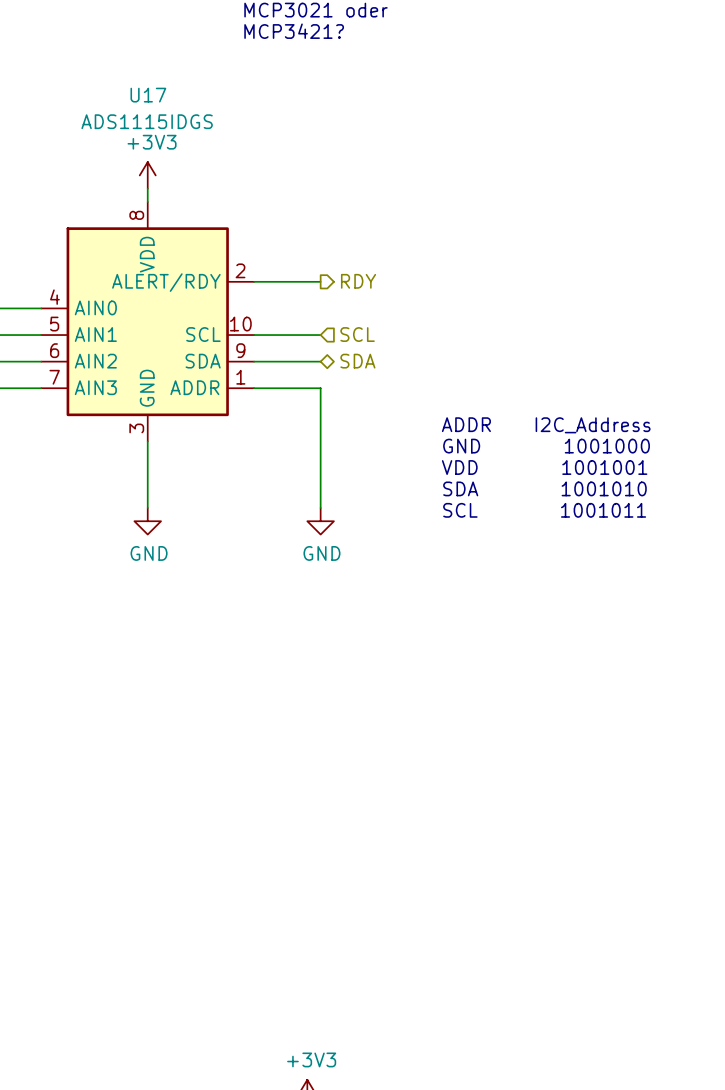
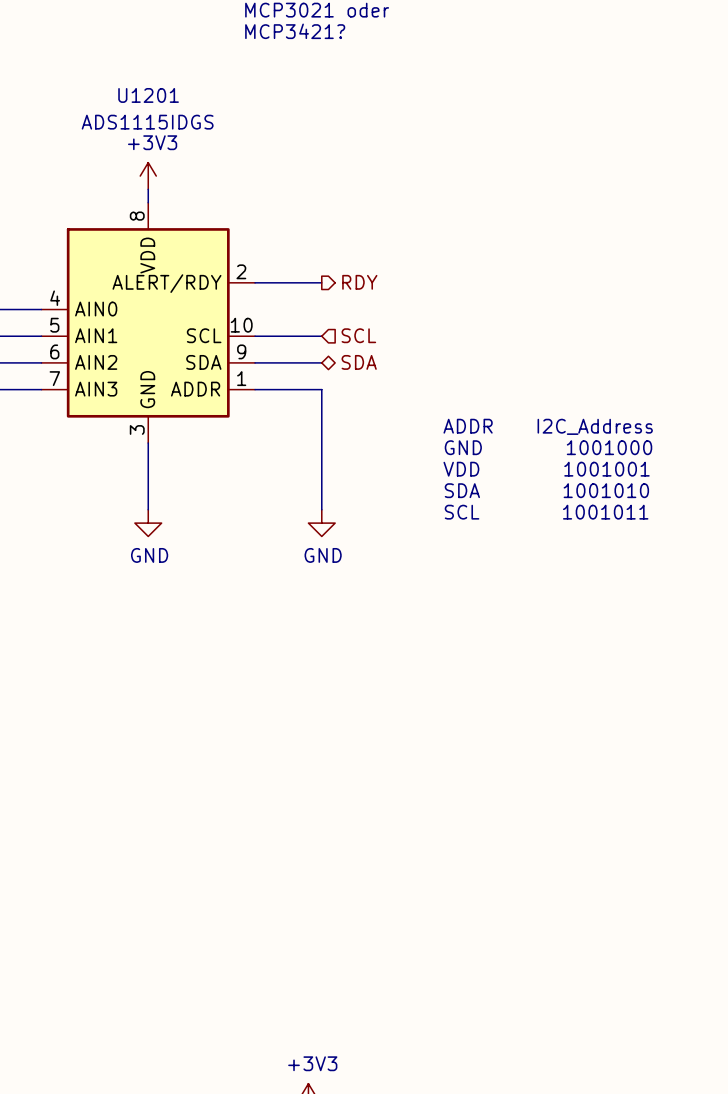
U17 name: U17 (148, 95) -> U1201 (148, 95)

